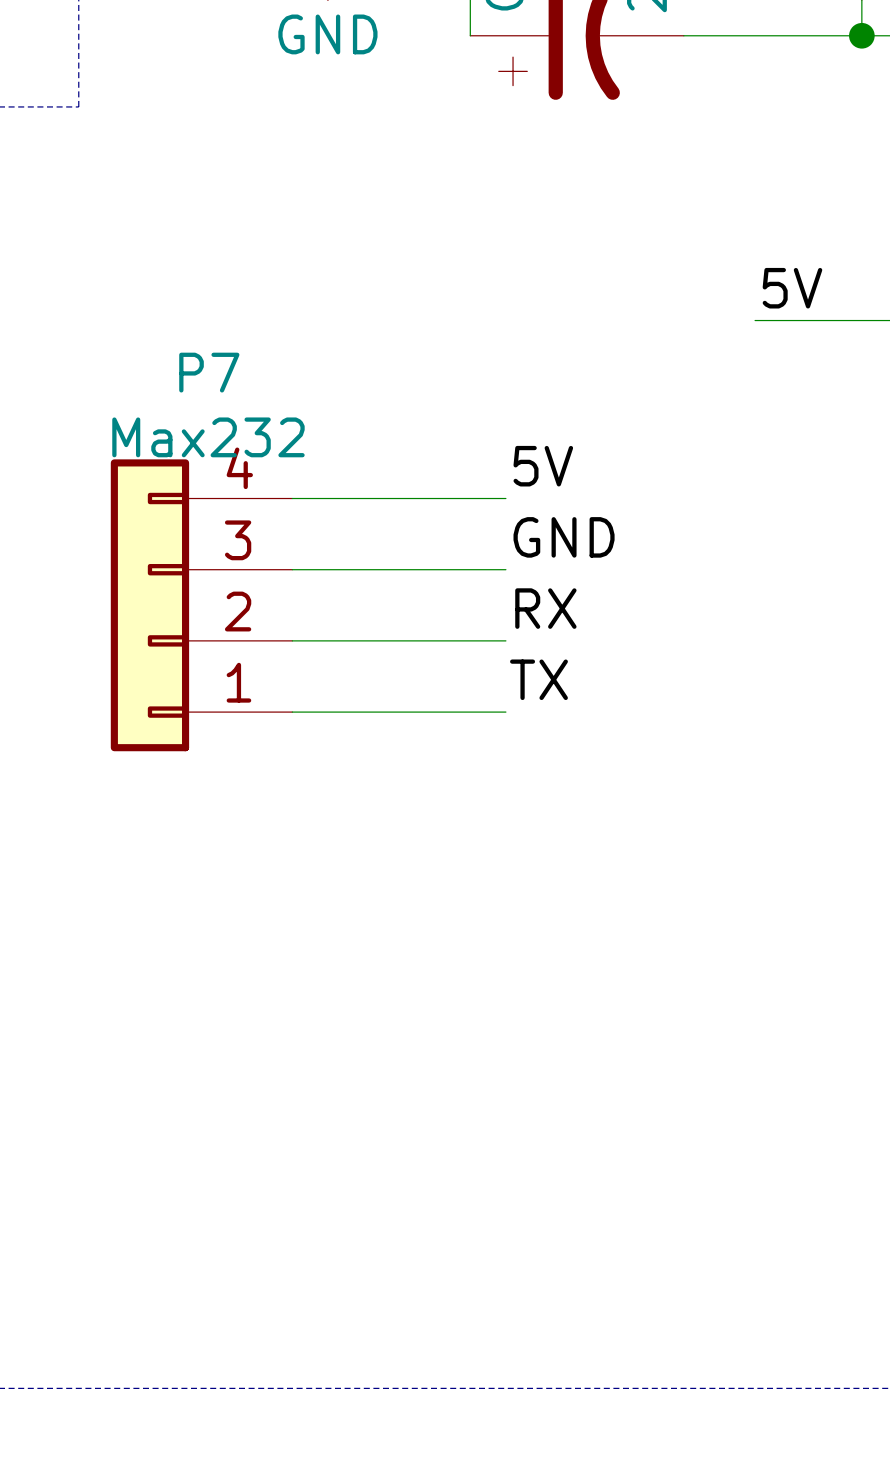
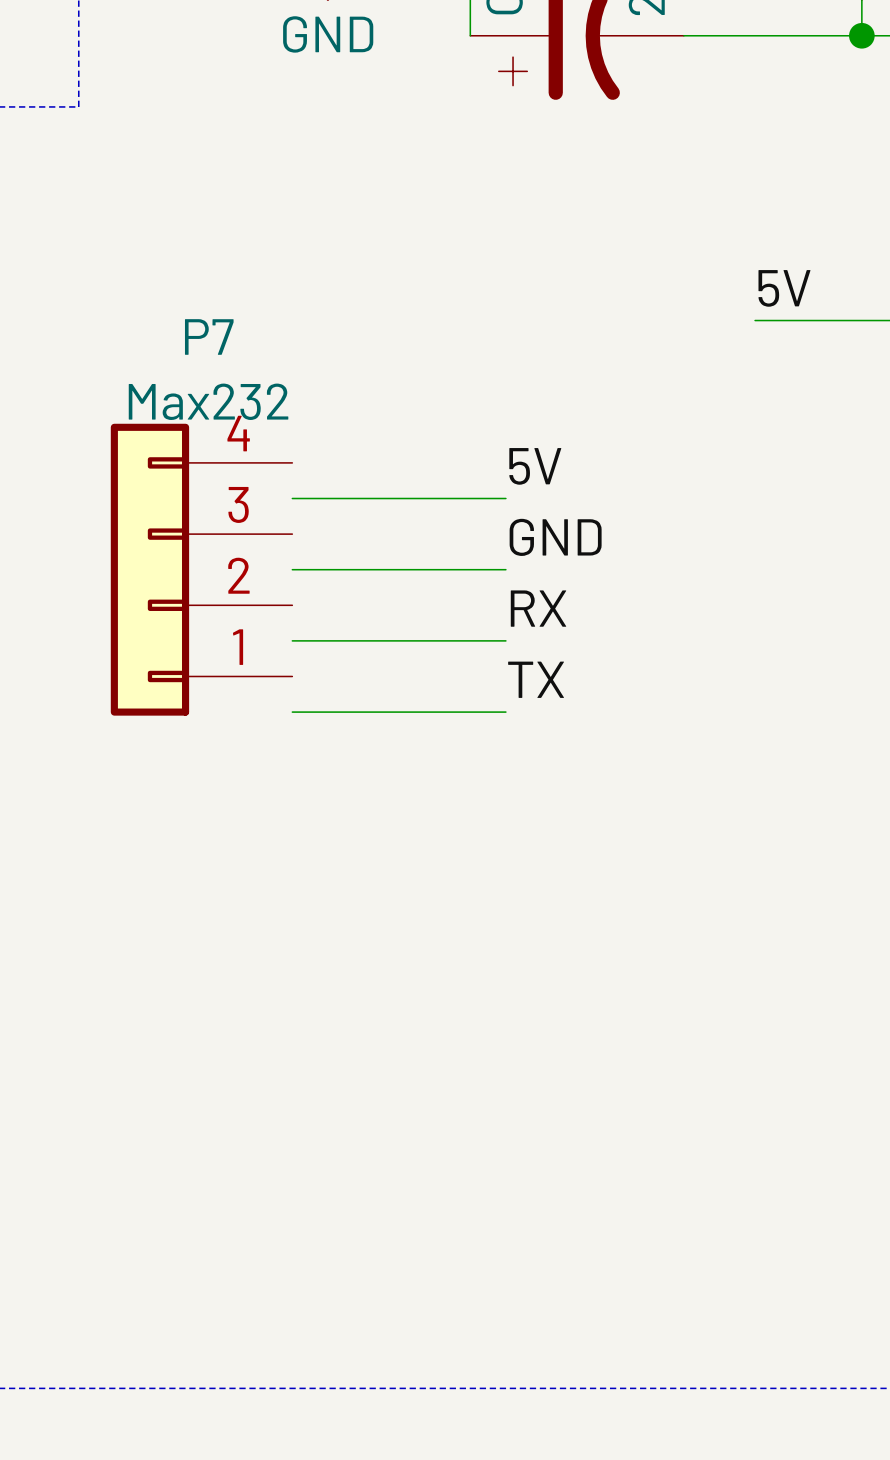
P7 position: (201, 605) -> (201, 569)

